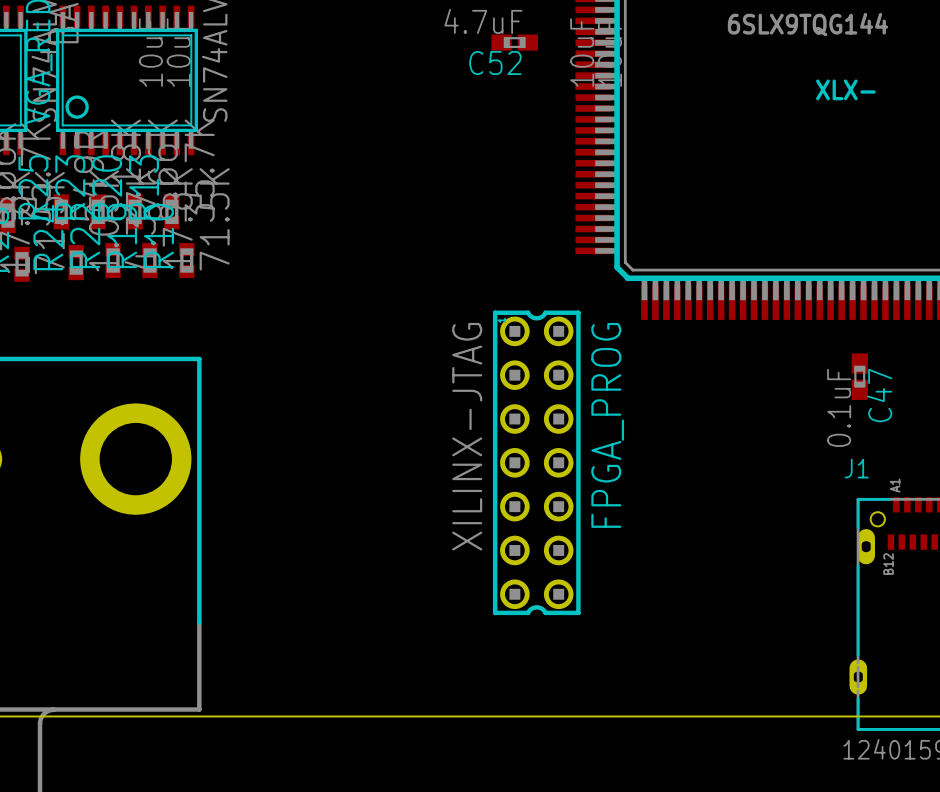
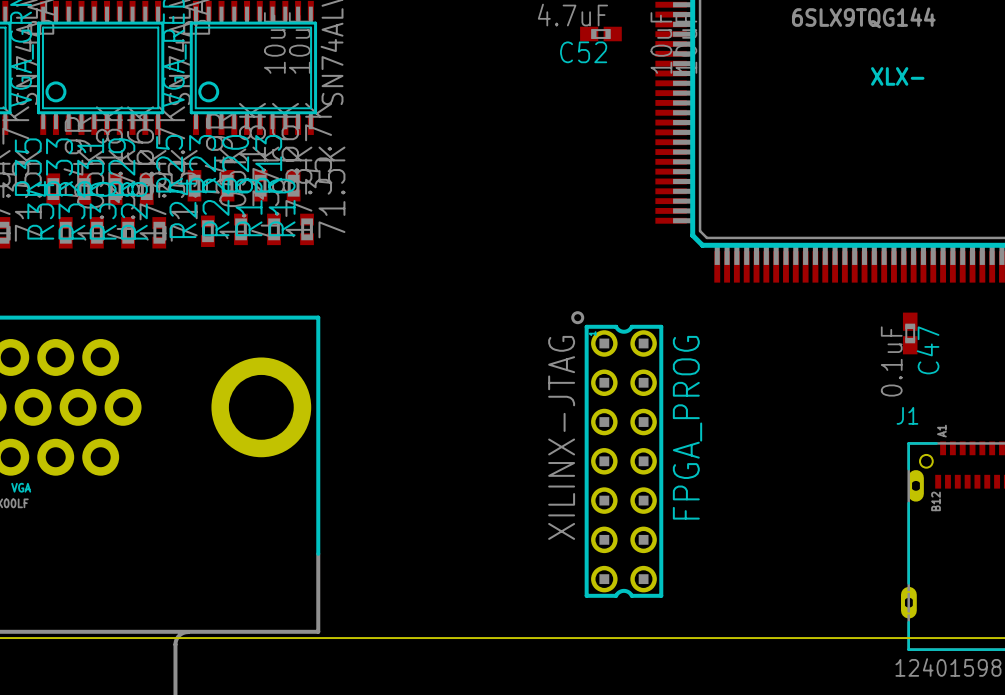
drawing: none -> [571, 311, 585, 325]
FPGA_PROG position: (536, 462) -> (623, 461)

